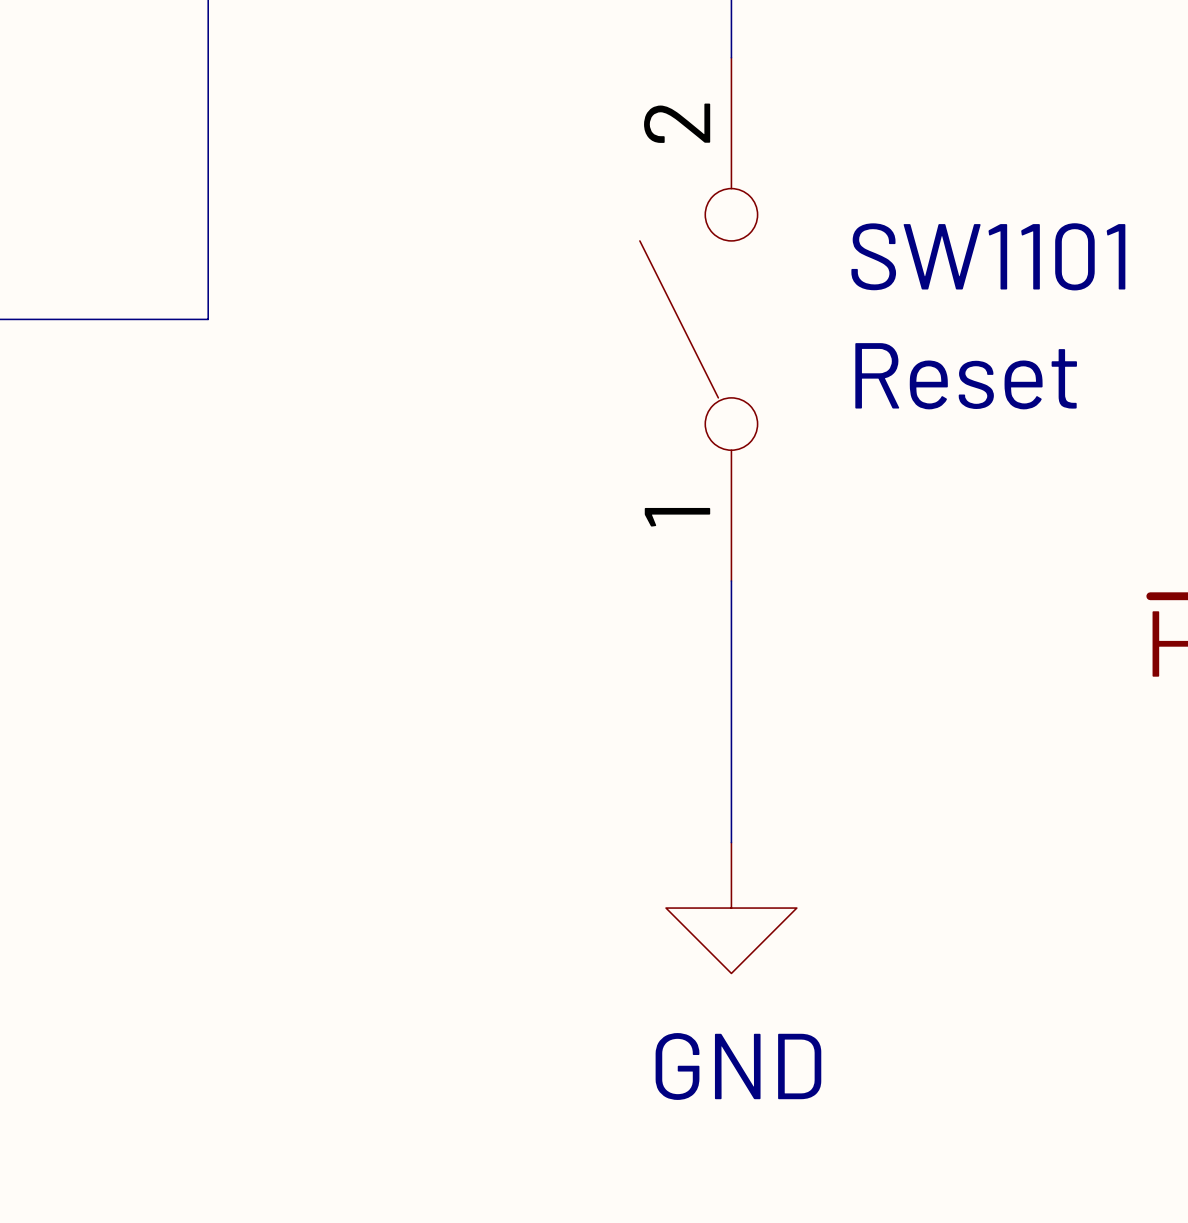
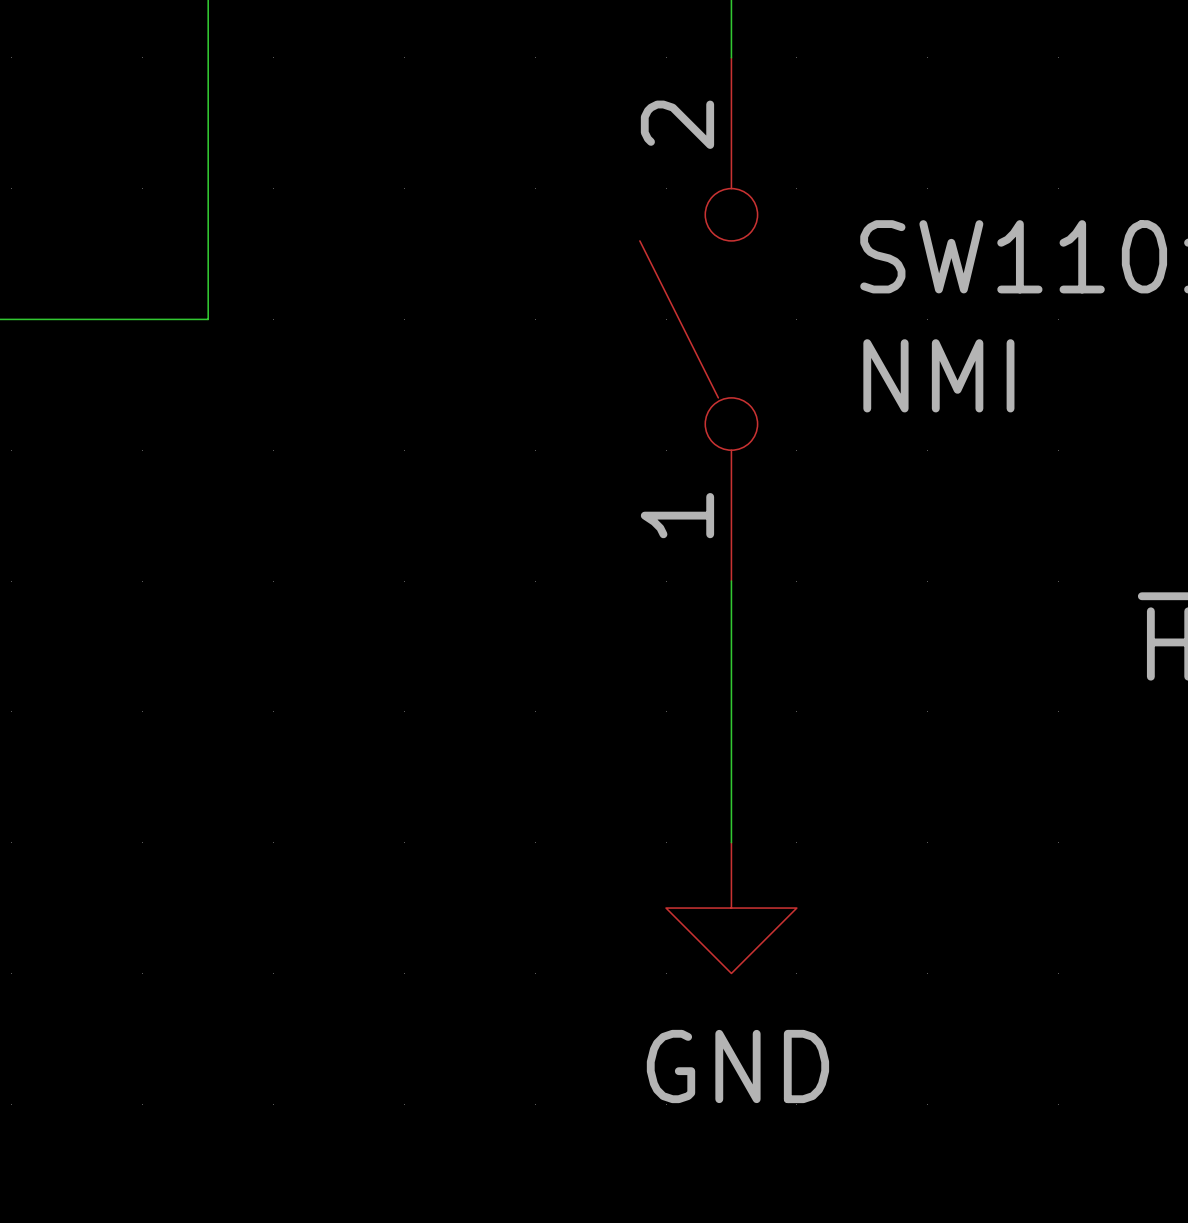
SW1101 value: Reset (966, 376) -> NMI (938, 375)

